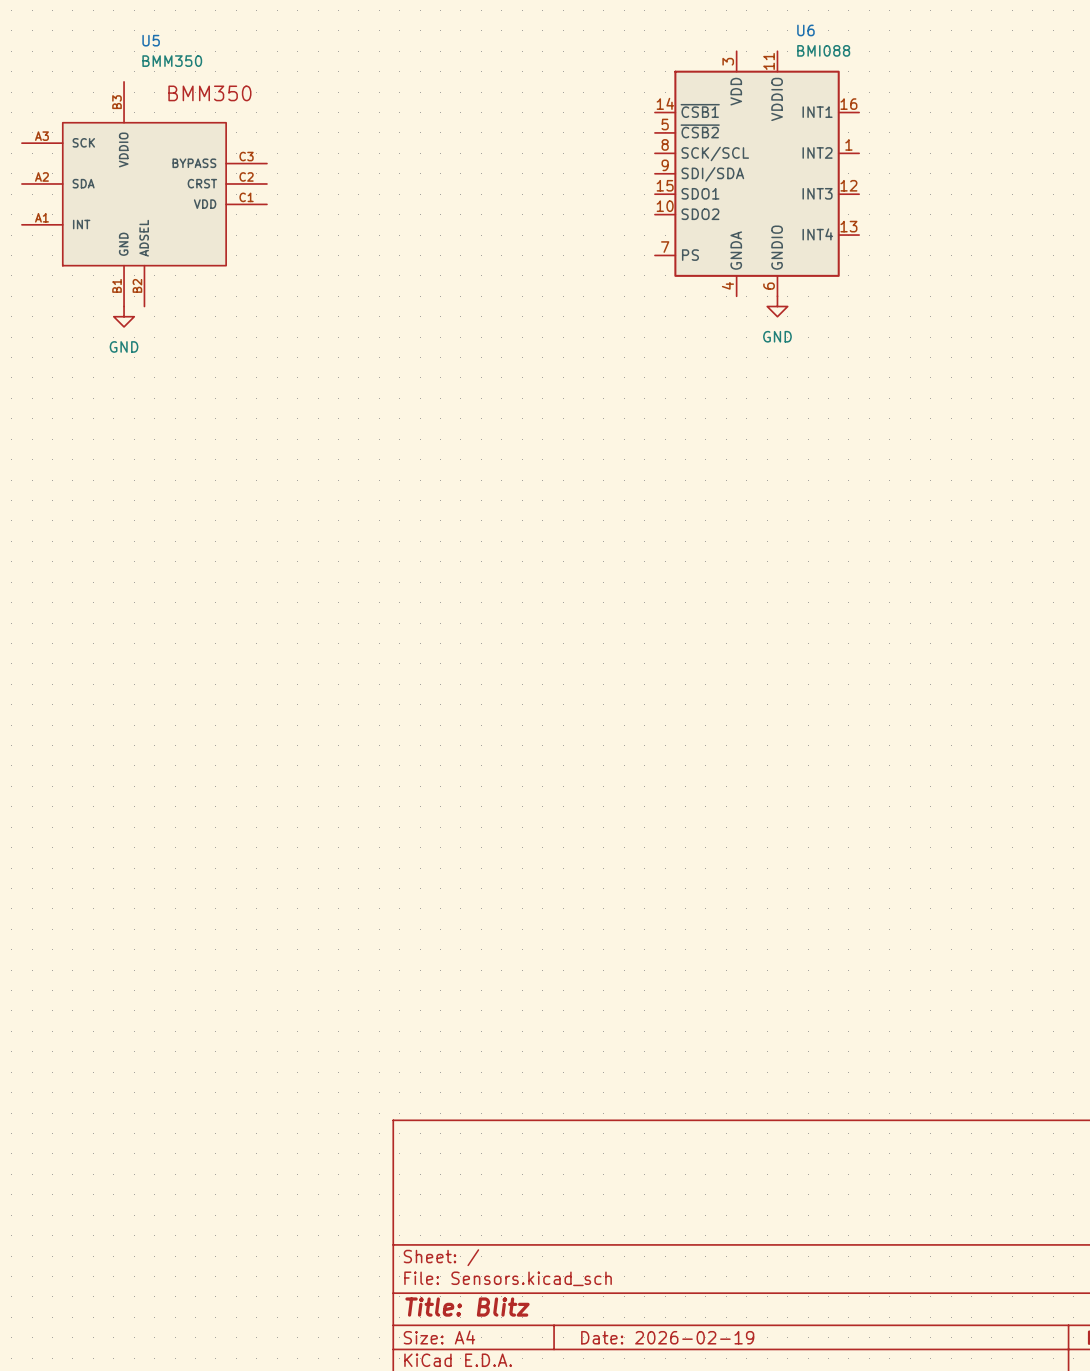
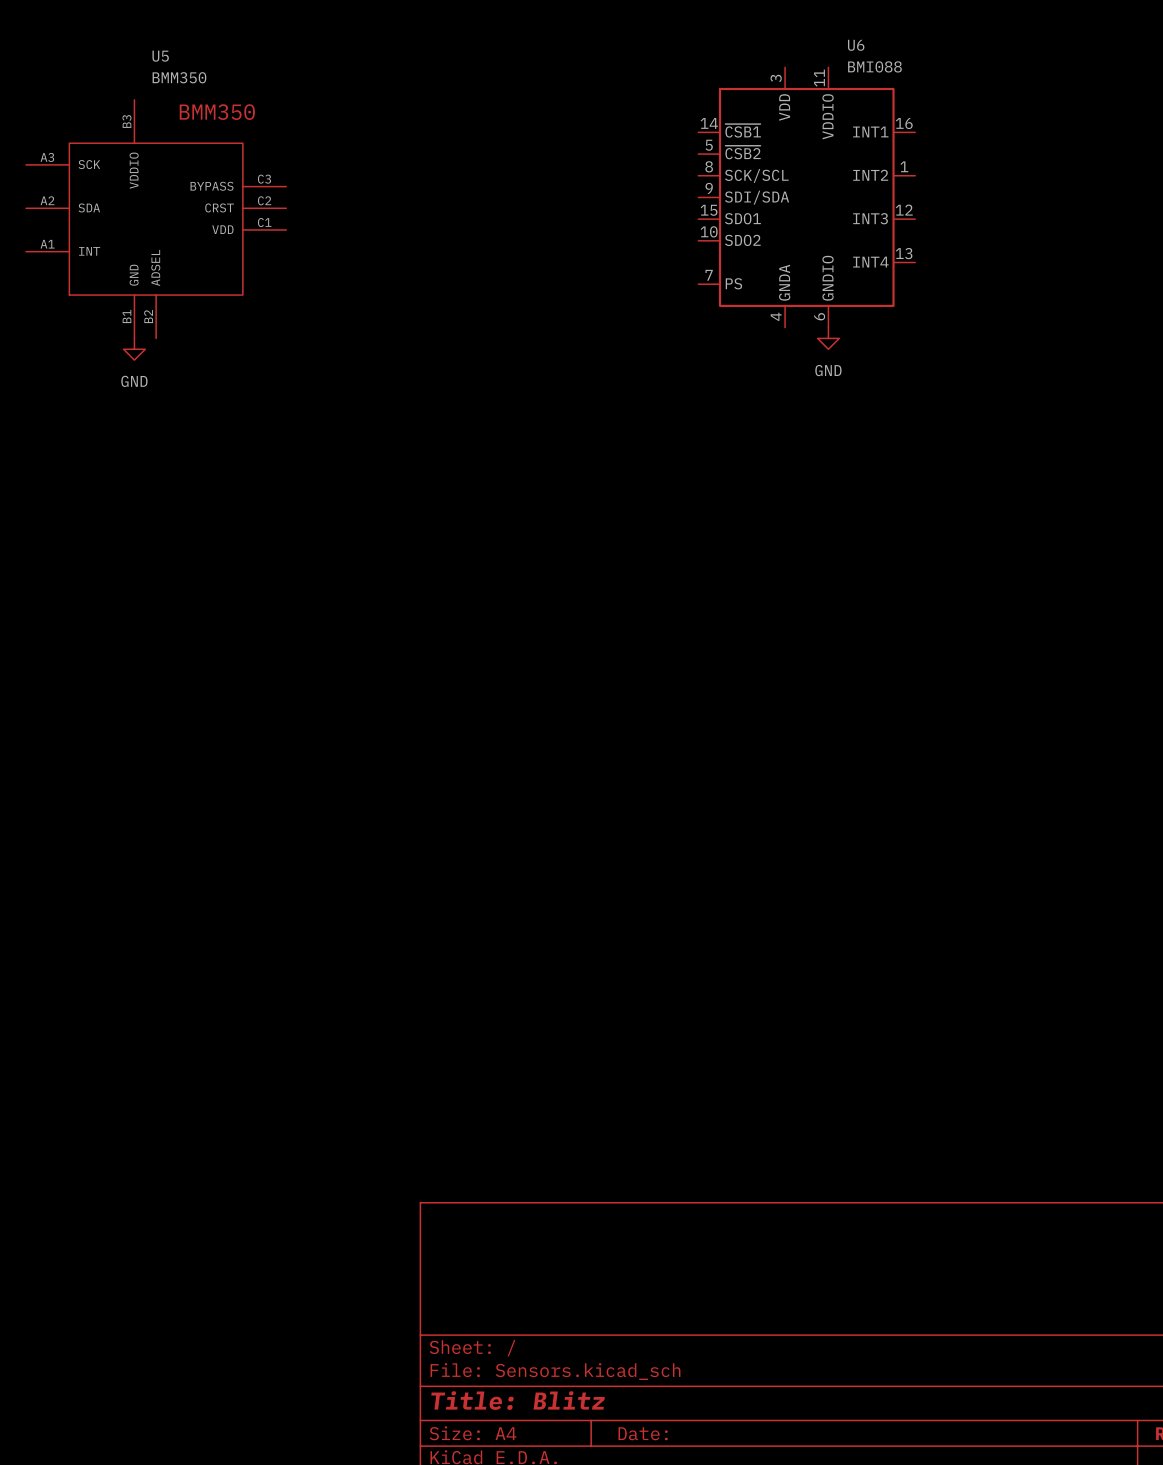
title block: Date: 2026-02-19 (667, 1337) -> Date: (643, 1433)

